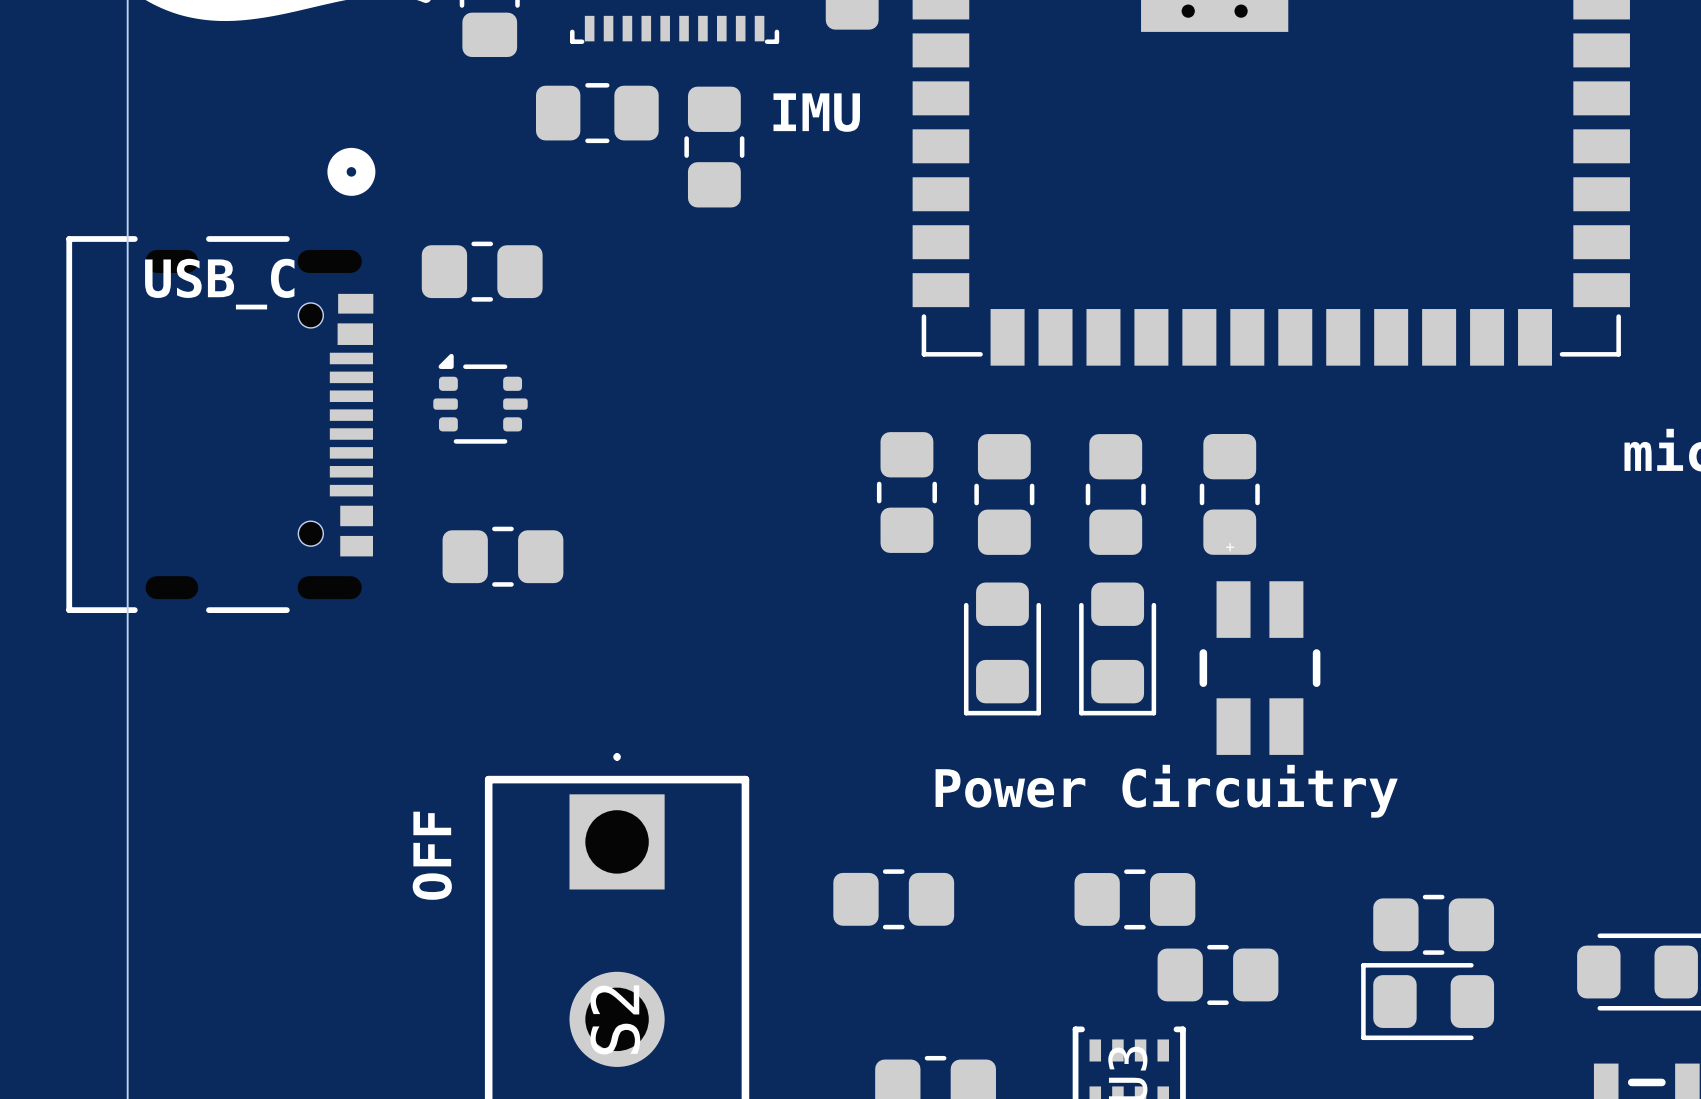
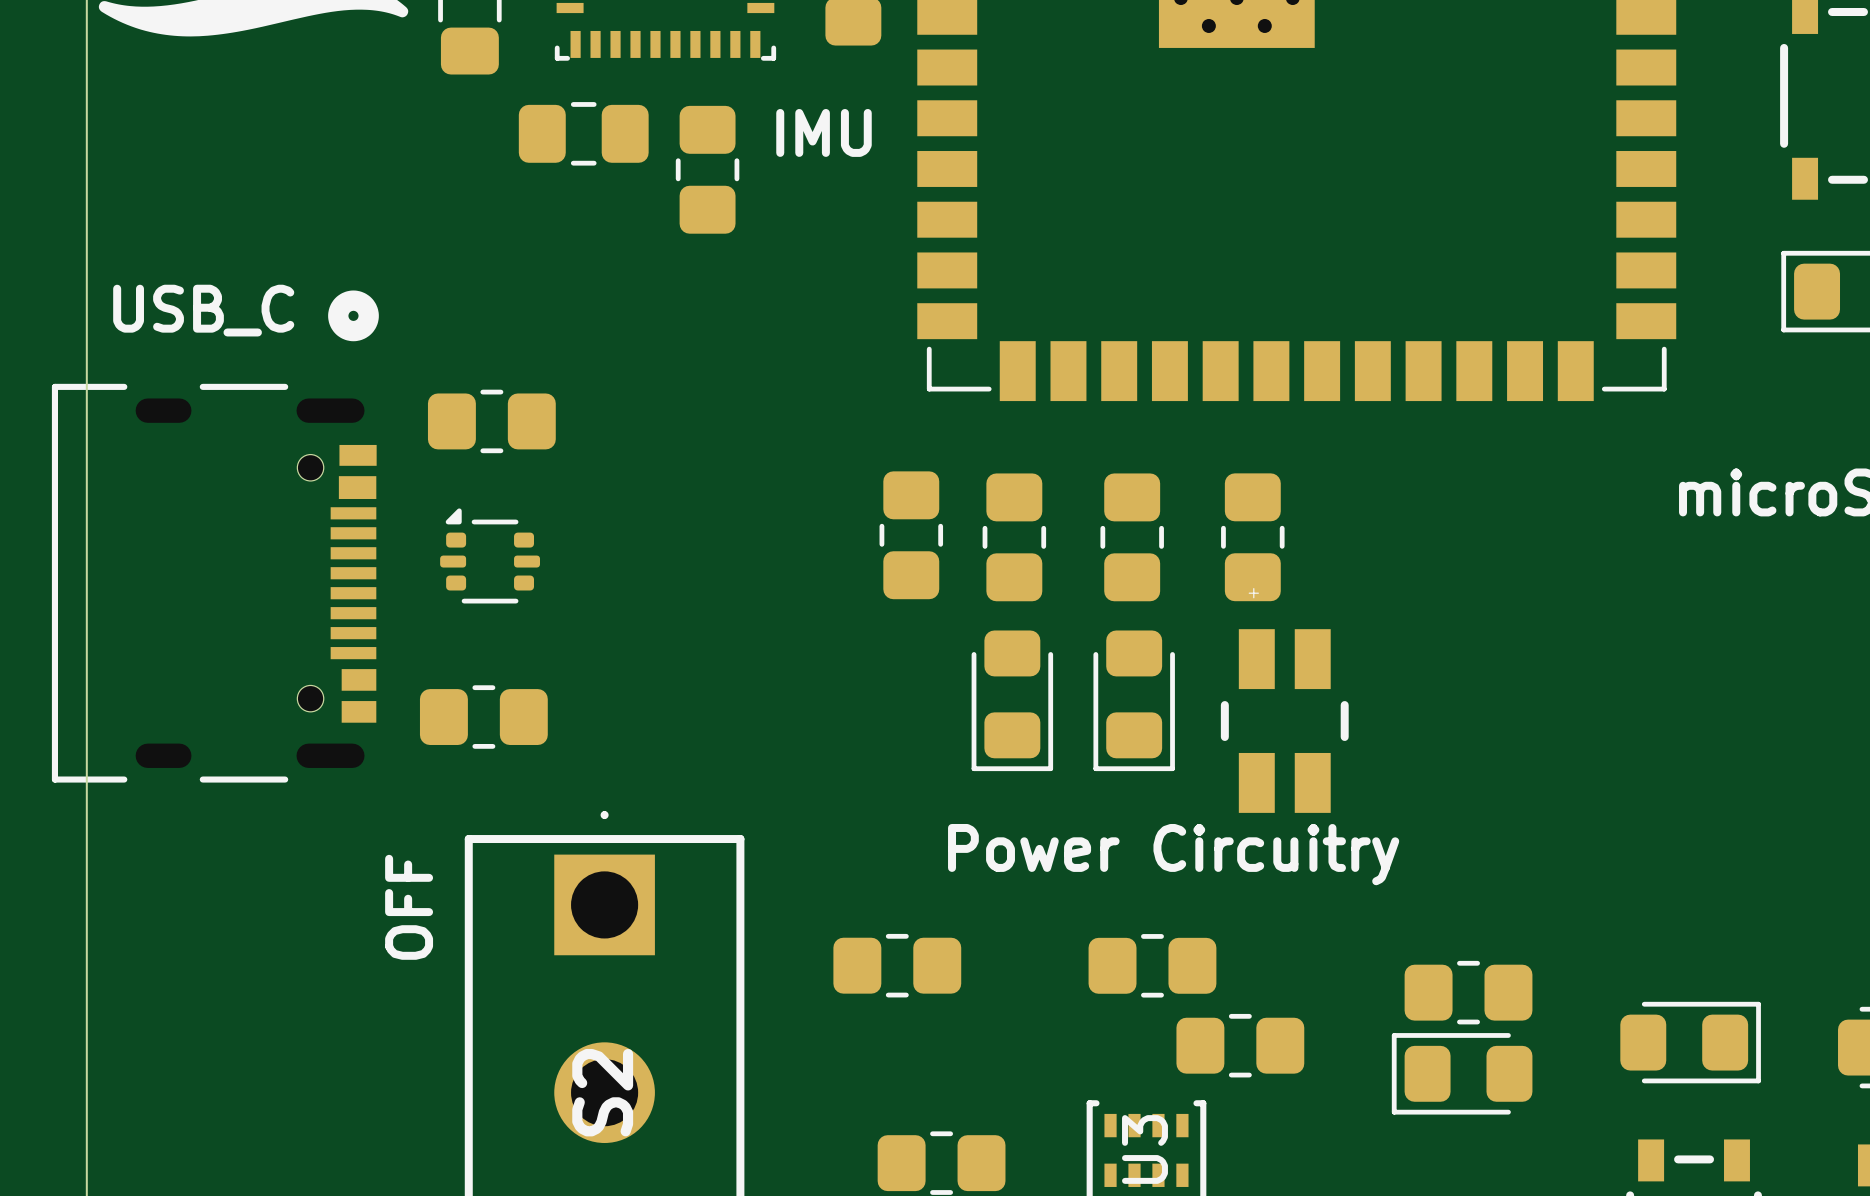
part: (482, 271) -> none
part footprint: [433, 353, 528, 444] -> [427, 389, 556, 454]
part position: (220, 380) -> (215, 536)
part: none -> (490, 555)
part position: (502, 556) -> (483, 717)

